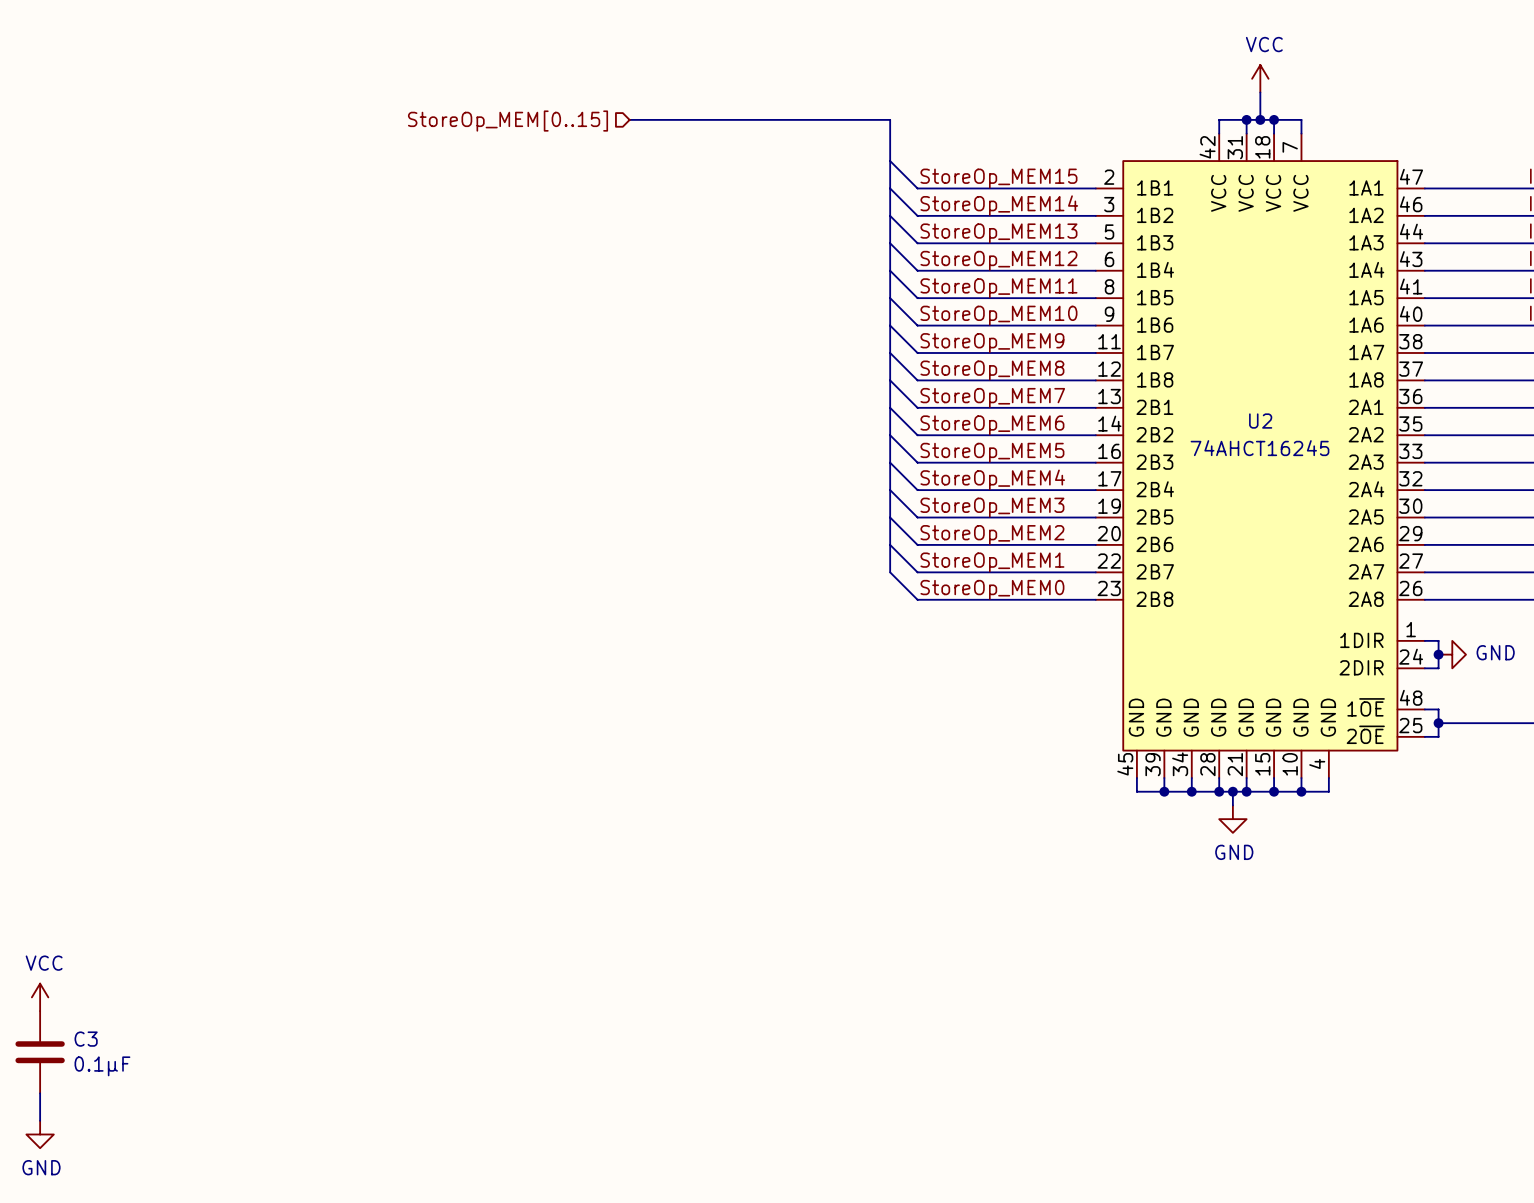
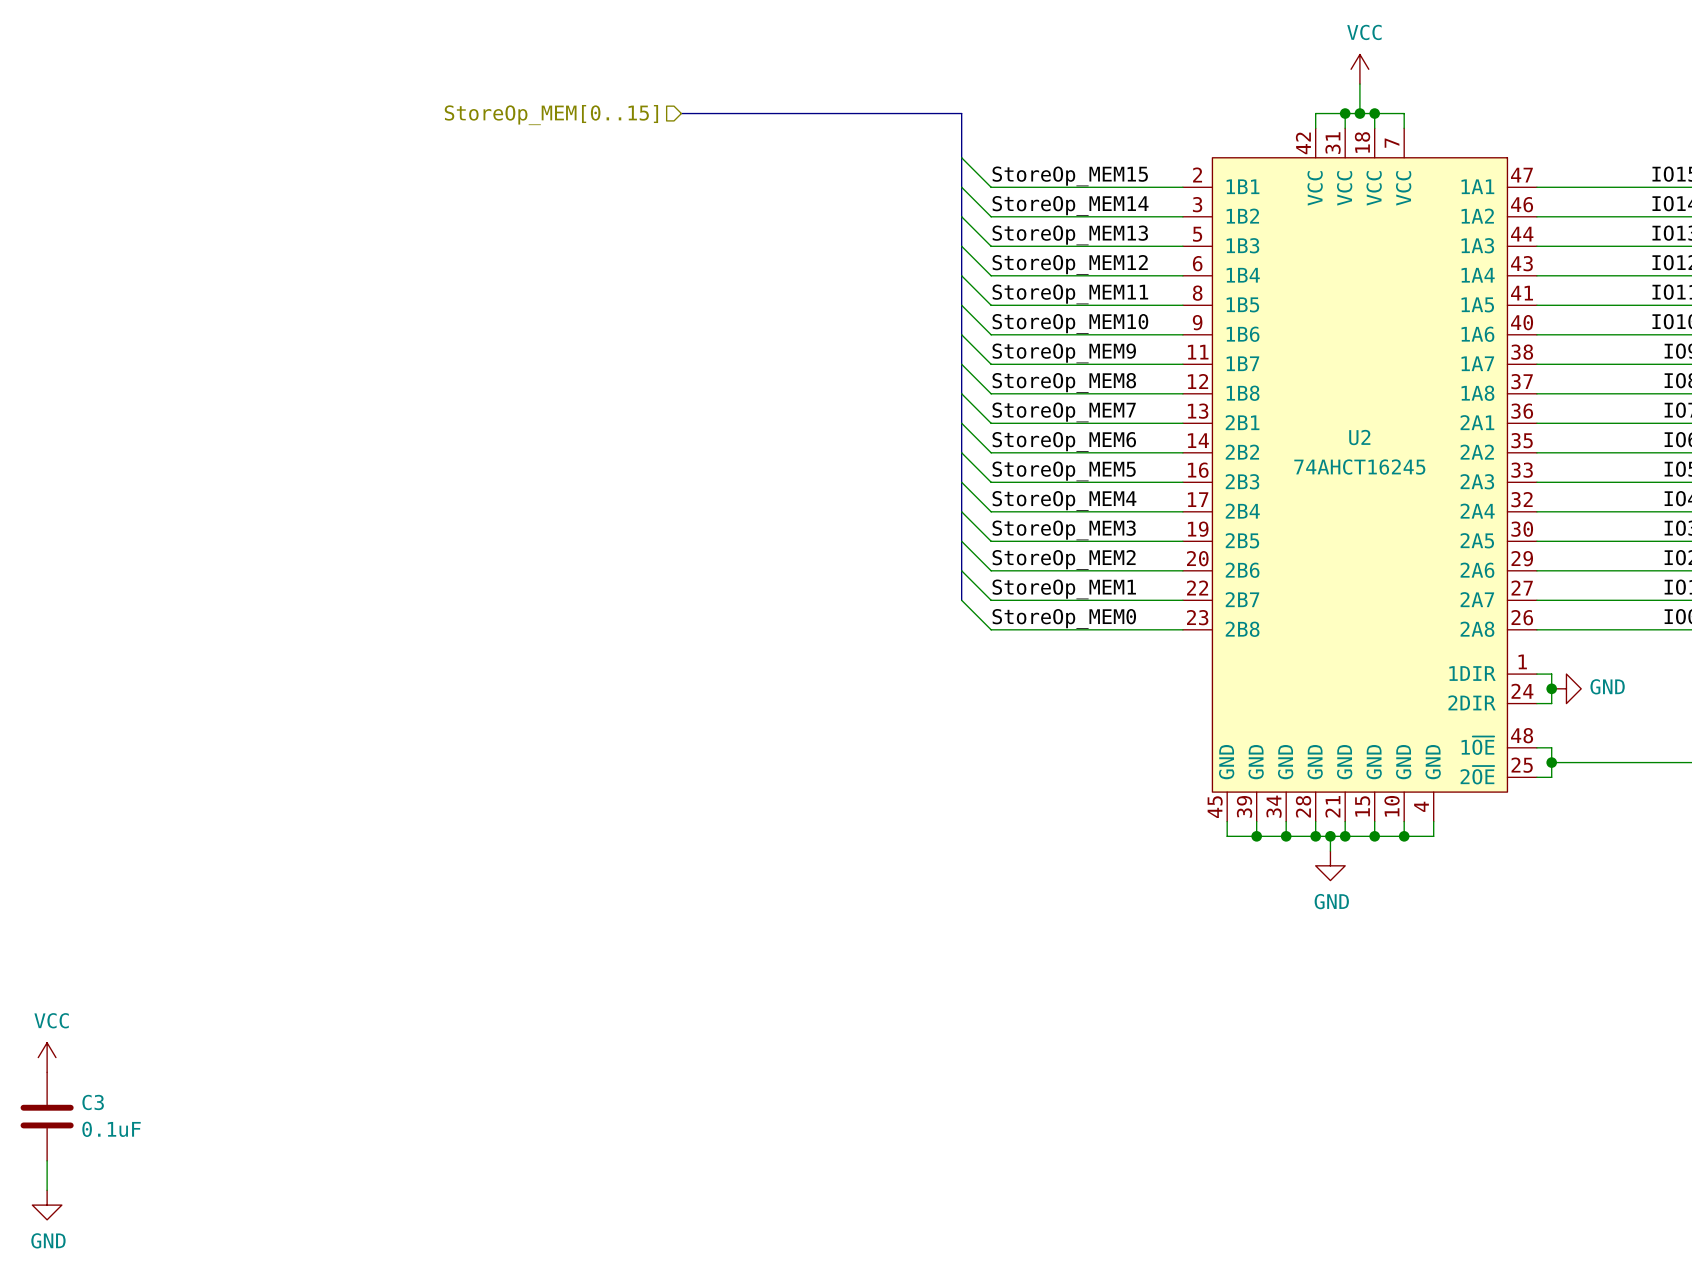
C3 value: 0.1μF (102, 1066) -> 0.1uF (111, 1129)

